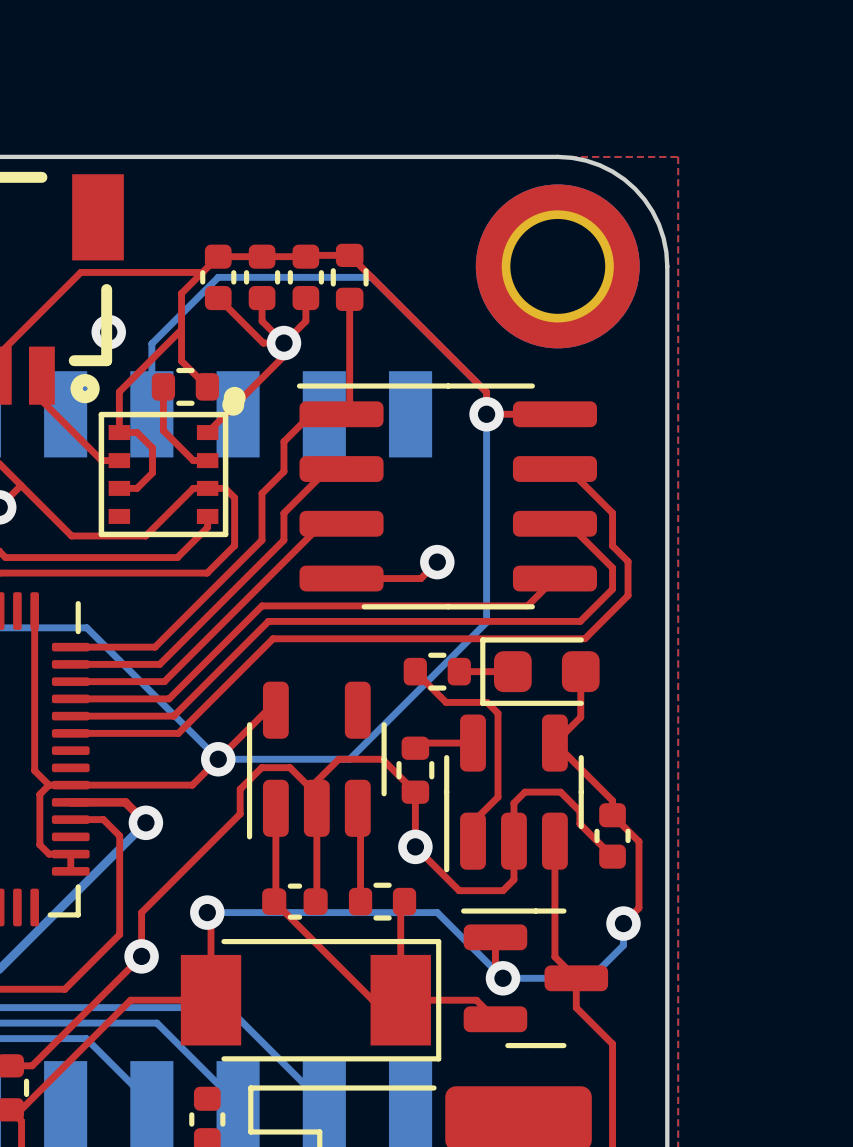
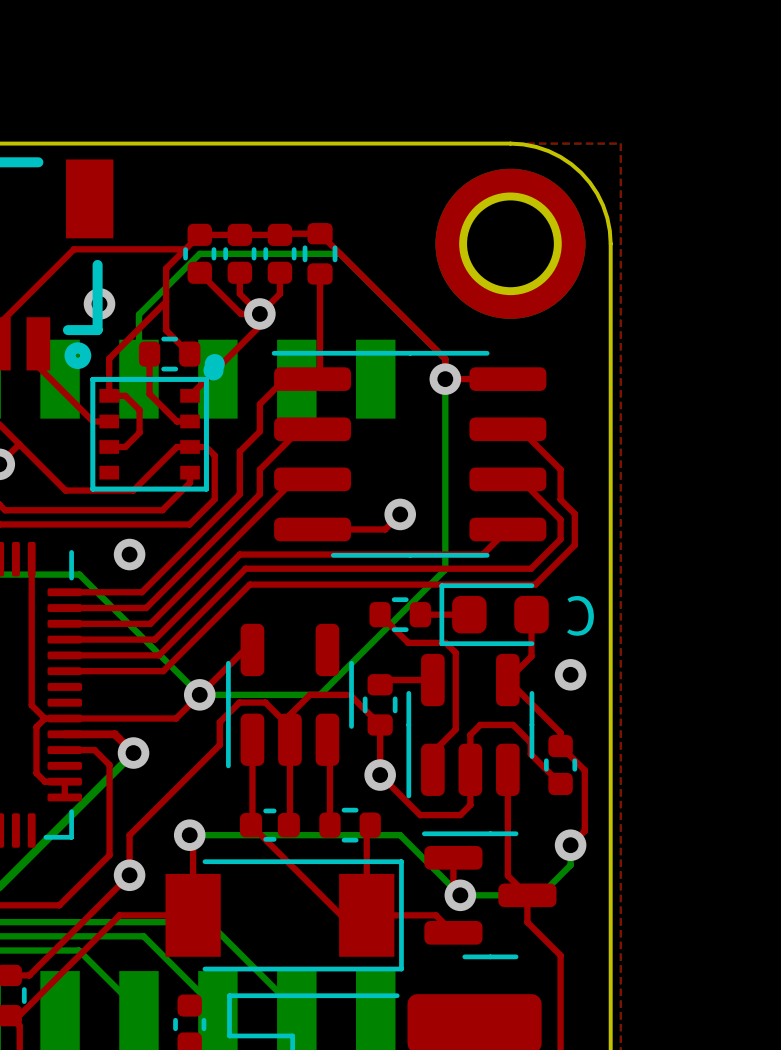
via: none -> (129, 554)
text: none -> C (580, 615)
via: none -> (570, 674)

